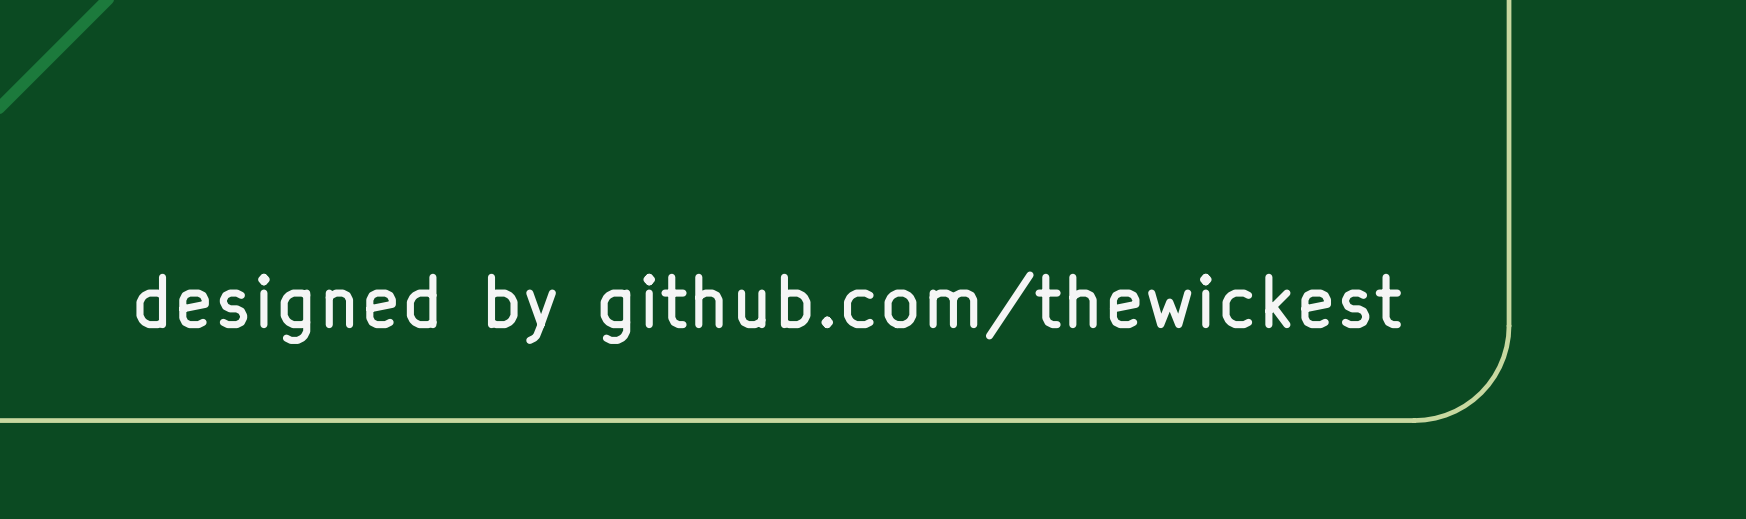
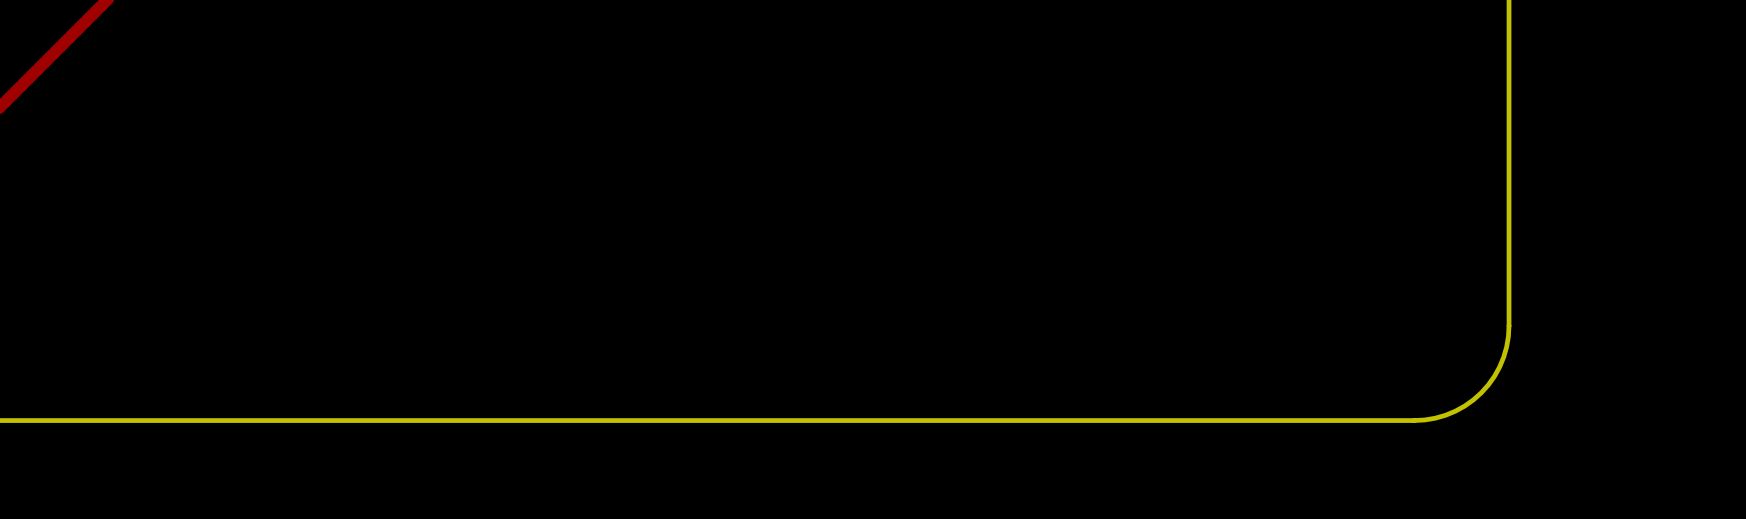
text: designed by github.com/thewickest (768, 307) -> none

